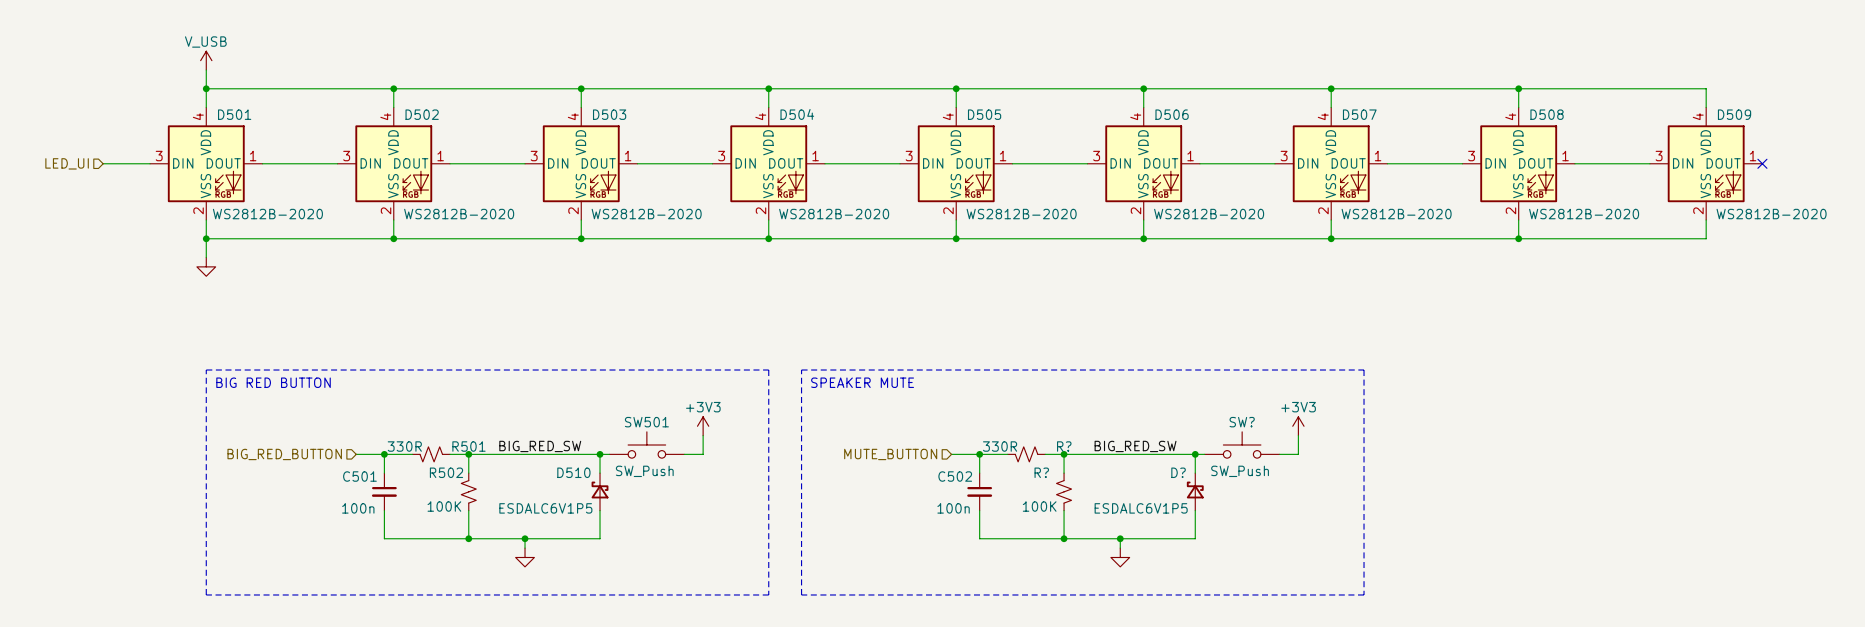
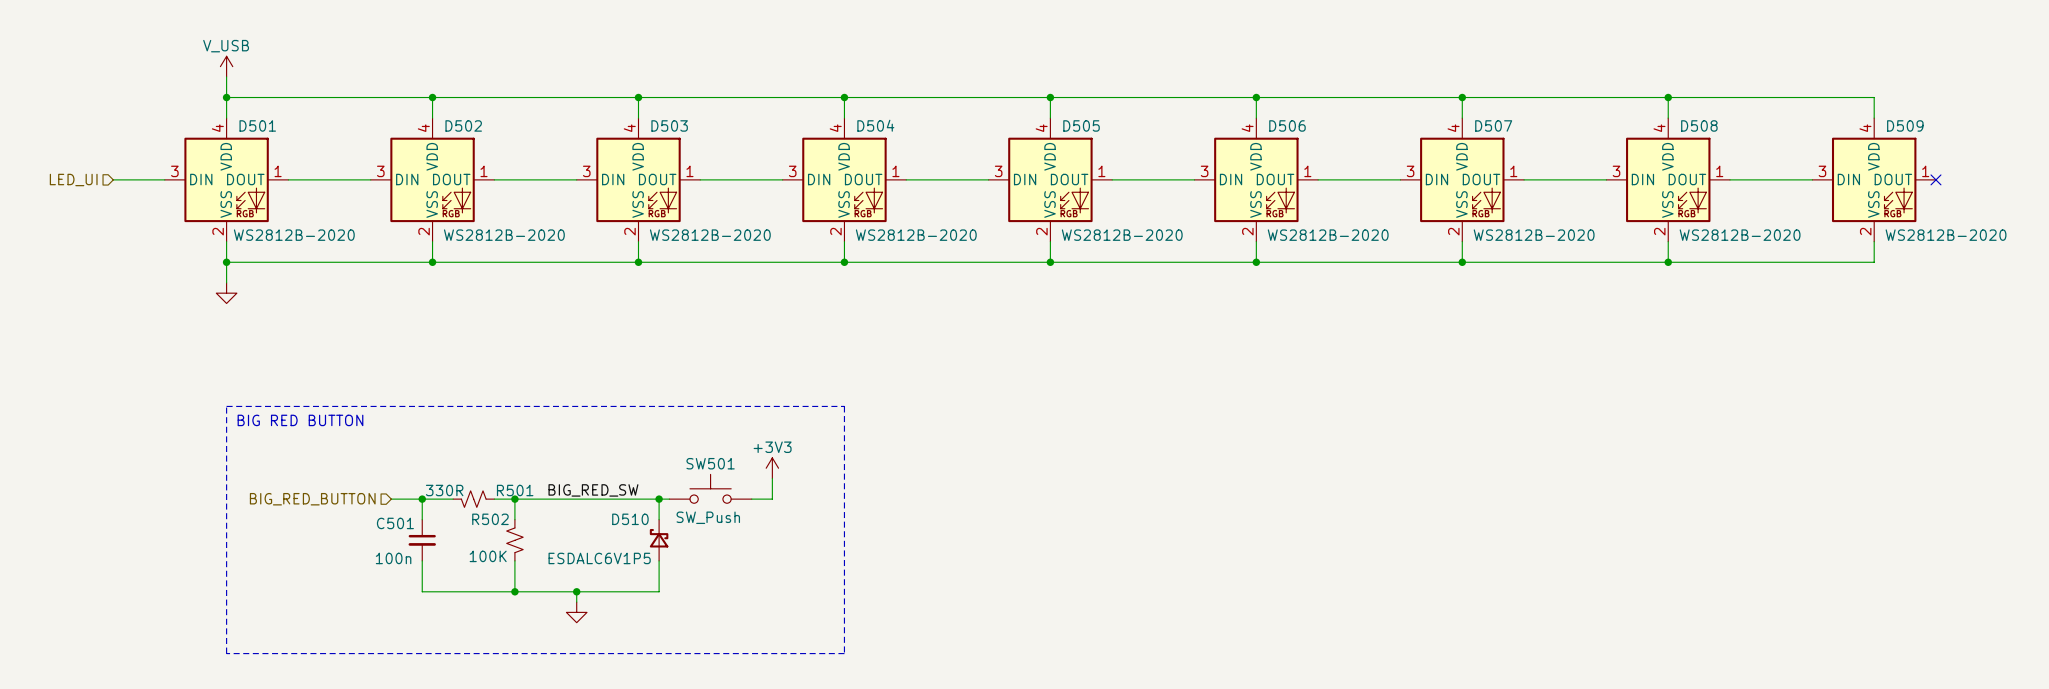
line: (801, 370) (1364, 370) (1364, 594) (801, 594) (801, 370) -> none
text: SPEAKER MUTE (862, 382) -> none
power symbol: +3V3 (1298, 426) -> none
wire: (1298, 435) (1298, 454) (1279, 454) -> none
SW?: SW_Push (1242, 445) -> none
label: BIG_RED_SW (1135, 446) -> none
hierarchical label: MUTE_BUTTON (890, 454) -> none
wire: (951, 454) (1007, 454) -> none
wire: (979, 454) (979, 473) -> none
junction: (979, 454) -> none
R?: 330R (1026, 454) -> none
wire: (1045, 454) (1204, 454) -> none
wire: (1064, 454) (1064, 473) -> none
junction: (1064, 454) -> none
wire: (1195, 454) (1195, 473) -> none
junction: (1195, 454) -> none
C502: 100n (979, 491) -> none
R?: 100K (1064, 491) -> none
D?: ESDALC6V1P5 (1195, 491) -> none
wire: (979, 510) (979, 538) (1195, 538) (1195, 510) -> none
wire: (1064, 510) (1064, 538) -> none
junction: (1064, 538) -> none
wire: (1120, 538) (1120, 548) -> none
junction: (1120, 538) -> none
power symbol: (1120, 557) -> none

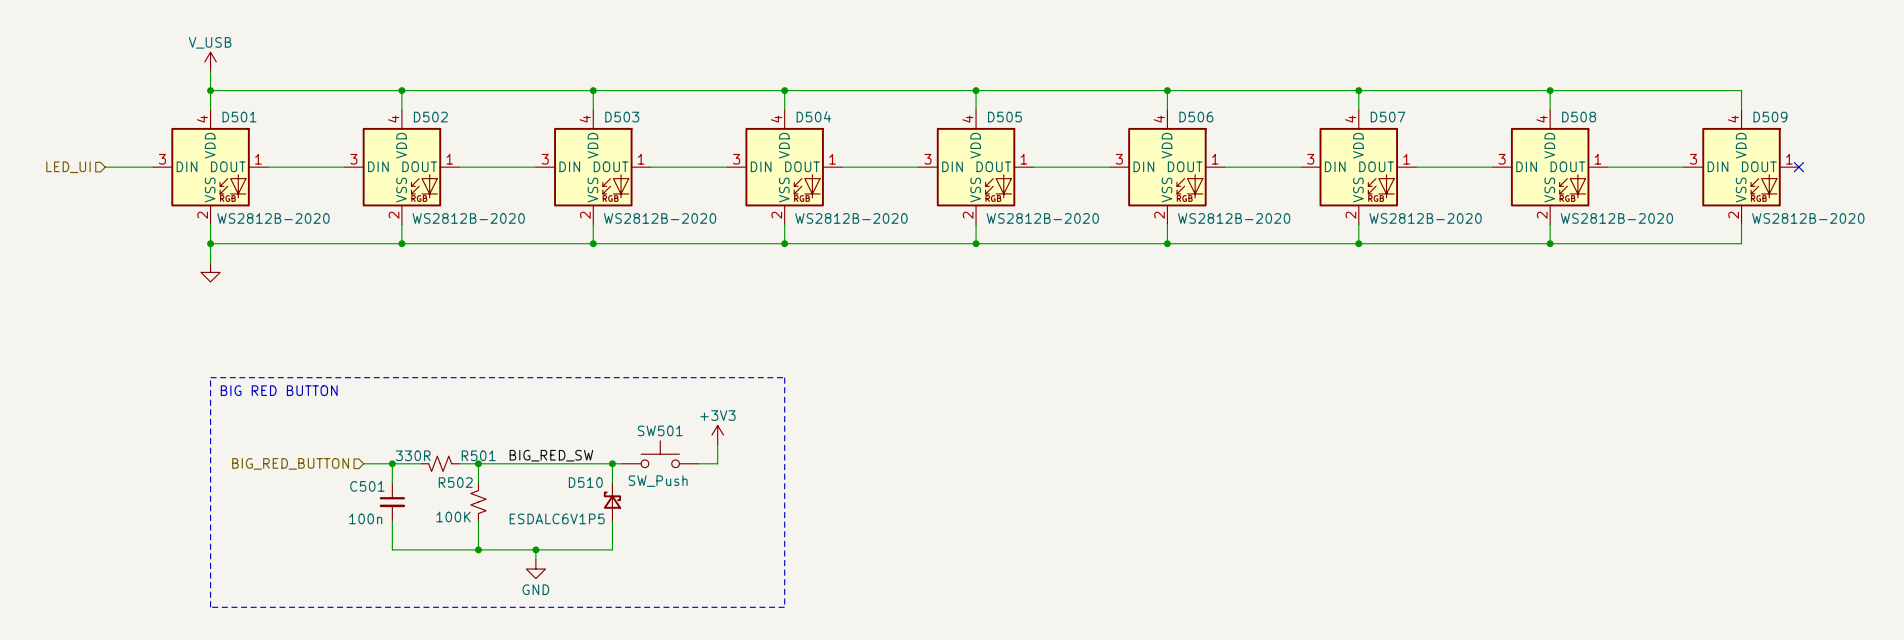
power symbol text: none -> GND (535, 589)

